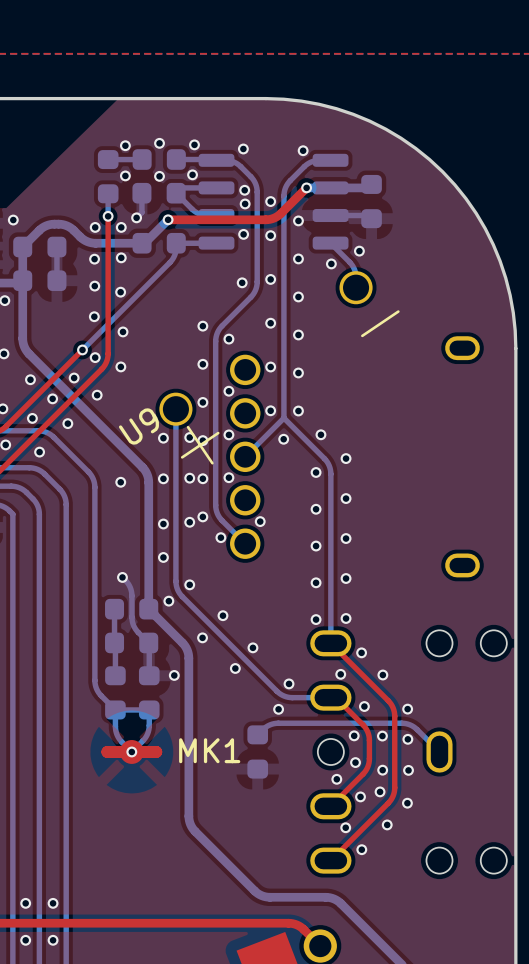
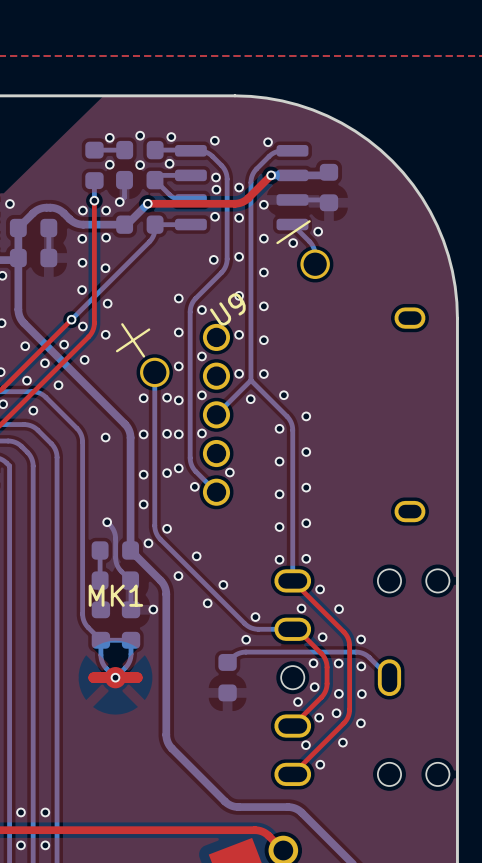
U9 footprint: [159, 271, 400, 465] -> [115, 220, 330, 388]
U9 name position: U9 (138, 426) -> U9 (227, 309)
MK1 name position: MK1 (209, 750) -> MK1 (115, 595)

